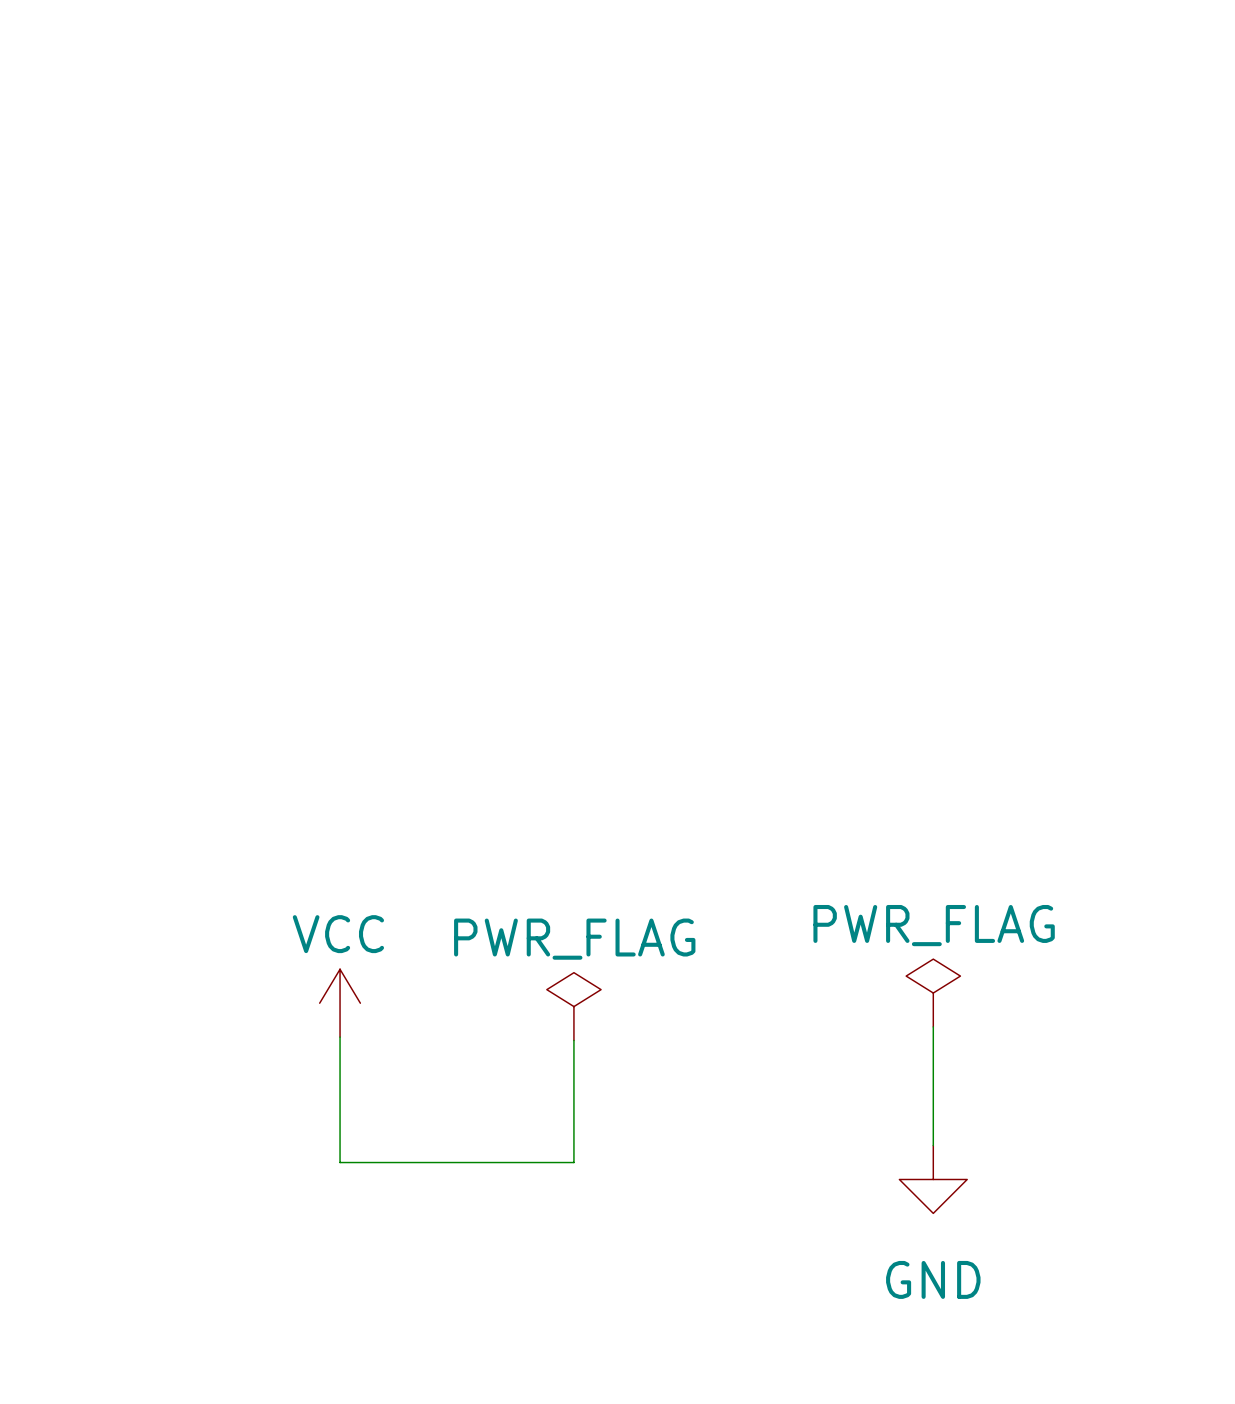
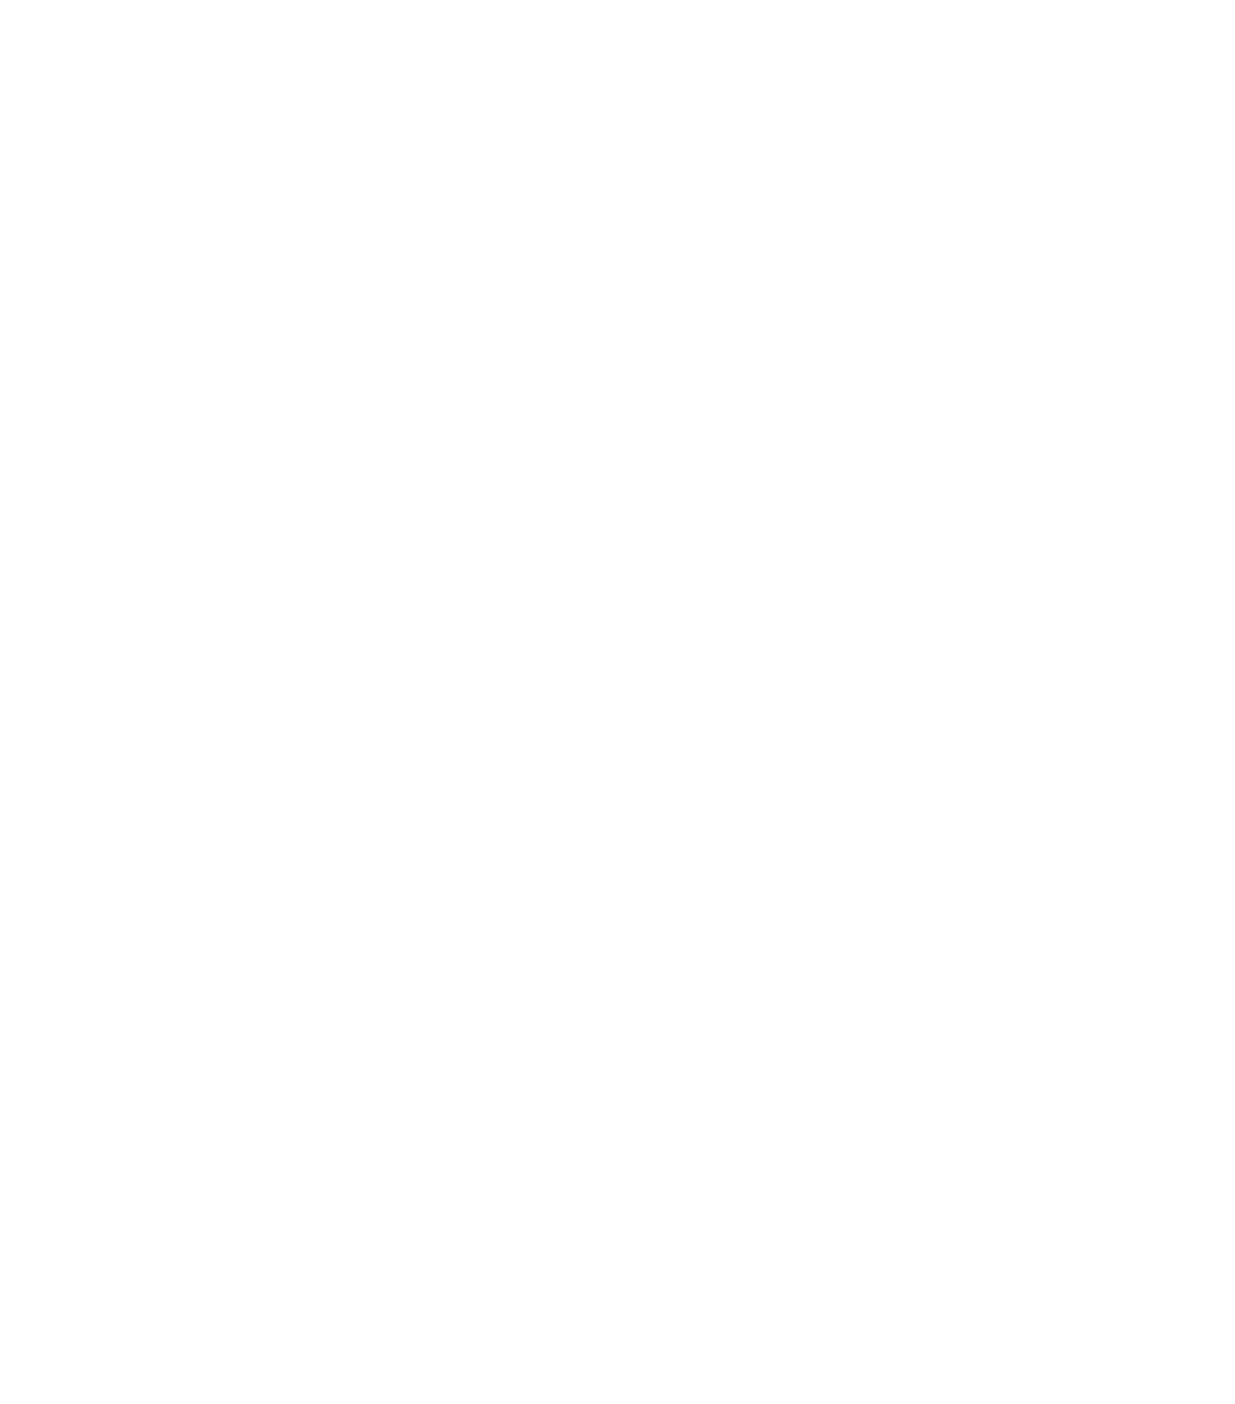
power symbol: PWR_FLAG (933, 993) -> none
power symbol: VCC (340, 1003) -> none
power symbol: PWR_FLAG (573, 1006) -> none
wire: (933, 1026) (933, 1145) -> none
wire: (340, 1037) (340, 1162) (573, 1162) (573, 1040) -> none
power symbol: GND (933, 1179) -> none

